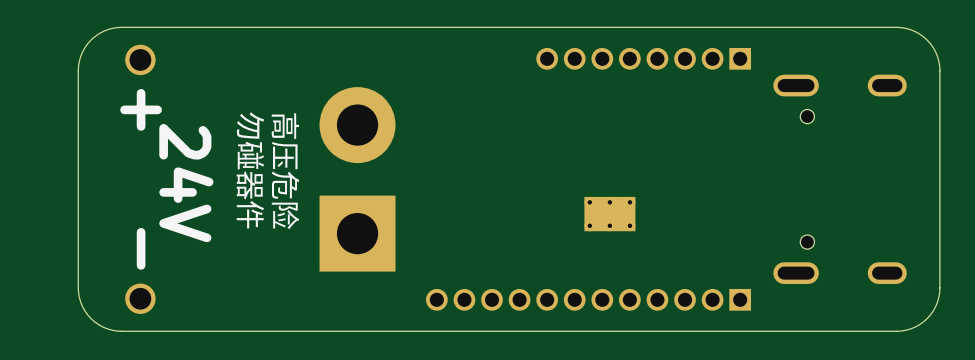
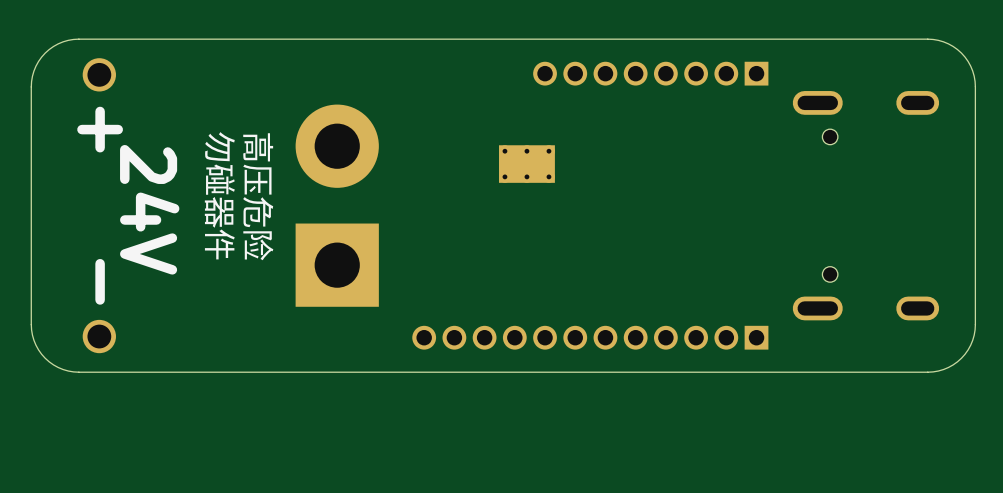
part position: (609, 214) -> (526, 164)

